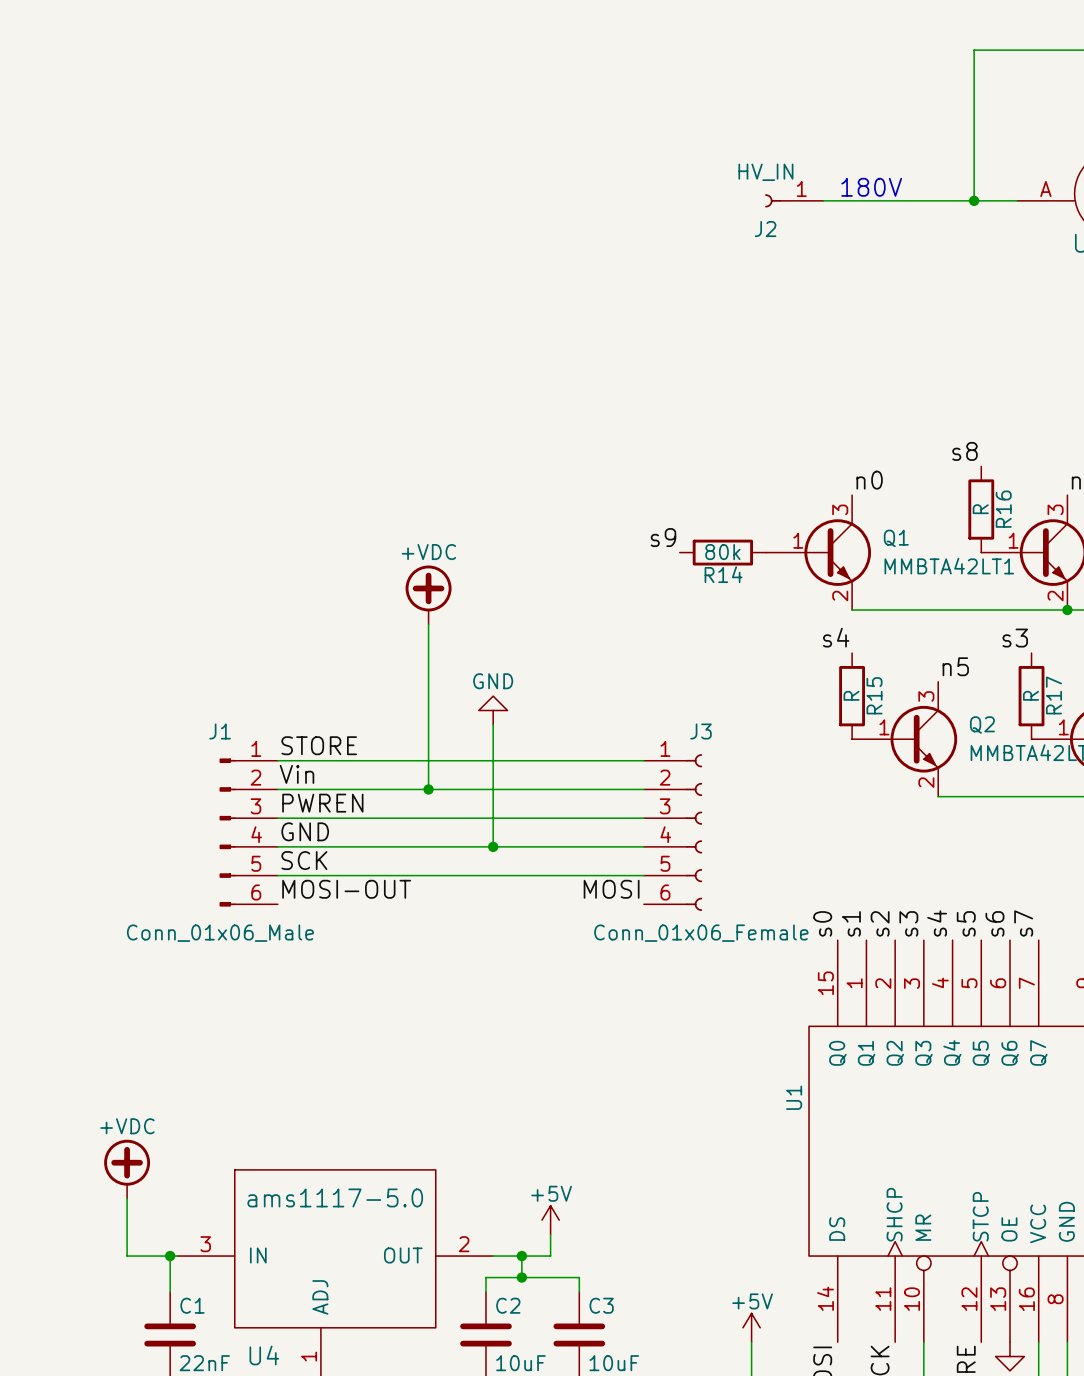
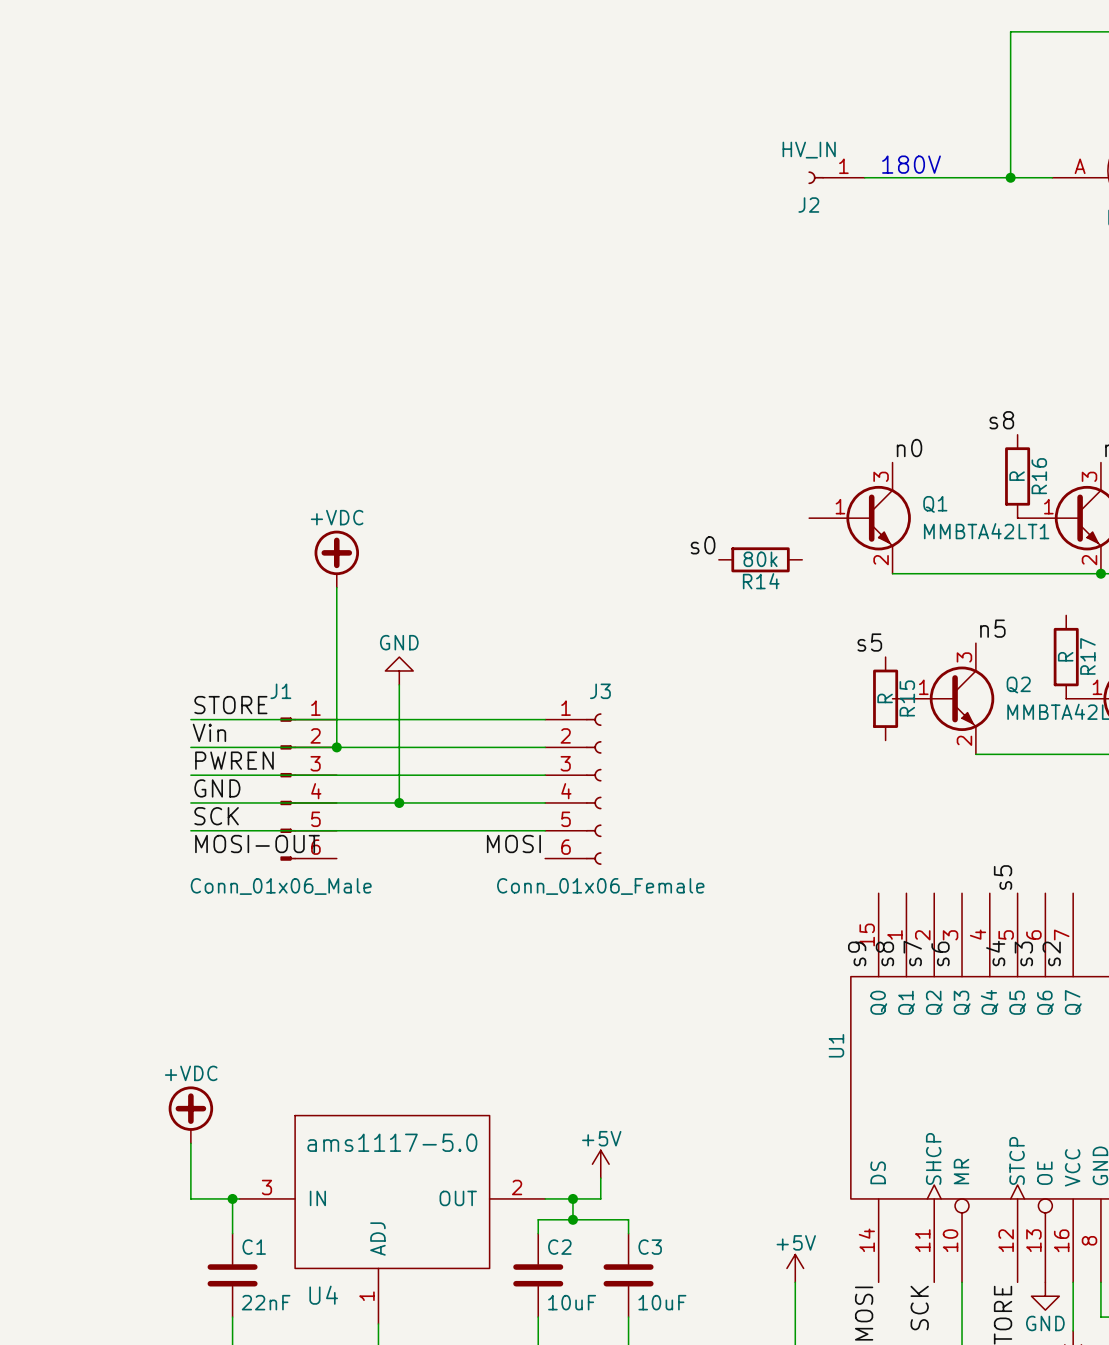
label: s9 (663, 537) -> none
R14 position: (722, 552) -> (760, 559)
label: none -> s0 (703, 545)
power symbol position: +VDC (428, 594) -> +VDC (336, 559)
wire: none -> (336, 587) (336, 747) (190, 747)
wire: (428, 624) (428, 789) -> none
label: s4 (836, 637) -> none
label: s3 (1015, 638) -> none
label: none -> s5 (869, 642)
R15 position: (852, 696) -> (885, 698)
power symbol position: GND (493, 710) -> GND (399, 670)
wire: none -> (399, 684) (399, 802)
wire: (493, 724) (493, 846) (643, 846) -> none
label position: STORE (319, 745) -> STORE (230, 705)
wire: none -> (190, 719) (336, 719)
wire: (493, 760) (643, 760) -> none
label position: Vin (297, 774) -> Vin (209, 732)
junction: none -> (336, 747)
junction: (428, 789) -> none
wire: (493, 789) (643, 789) -> none
label position: PWREN (322, 803) -> PWREN (234, 760)
wire: none -> (190, 775) (336, 775)
wire: (493, 818) (643, 818) -> none
label position: GND (305, 831) -> GND (217, 788)
J3 position: (673, 832) -> (573, 789)
wire: none -> (190, 802) (336, 802)
junction: none -> (399, 802)
junction: (493, 846) -> none
label position: SCK (304, 860) -> SCK (216, 816)
wire: none -> (190, 830) (336, 830)
wire: (493, 875) (643, 875) -> none
label position: MOSI-OUT (346, 889) -> MOSI-OUT (257, 844)
label position: MOSI (611, 889) -> MOSI (513, 844)
label: s0 (822, 923) -> none
label: s1 (851, 923) -> none
label position: s2 (880, 923) -> s2 (1051, 953)
label position: s3 (908, 923) -> s3 (1023, 953)
label position: s4 (937, 923) -> s4 (995, 953)
label position: s6 (994, 923) -> s6 (940, 953)
label: s7 (1023, 923) -> none
label: none -> s9 (857, 953)
label: none -> s8 (884, 953)
label: none -> s7 (912, 953)

